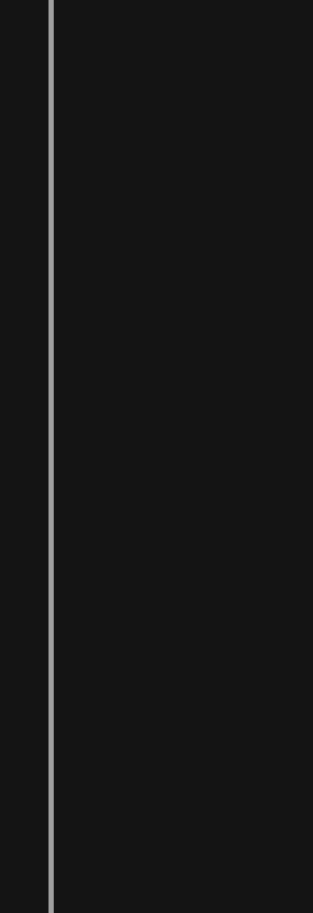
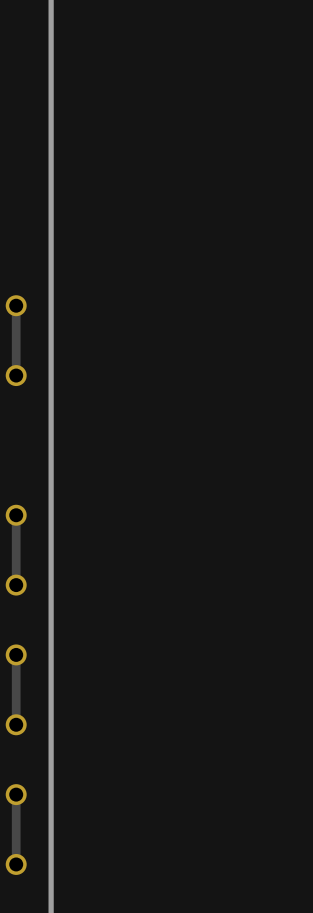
track: none -> (16, 305) (16, 375)
via: none -> (16, 305)
via: none -> (16, 375)
track: none -> (16, 515) (16, 585)
via: none -> (16, 515)
via: none -> (16, 585)
track: none -> (16, 654) (16, 724)
via: none -> (16, 654)
via: none -> (16, 724)
track: none -> (16, 794) (16, 864)
via: none -> (16, 794)
via: none -> (16, 864)

